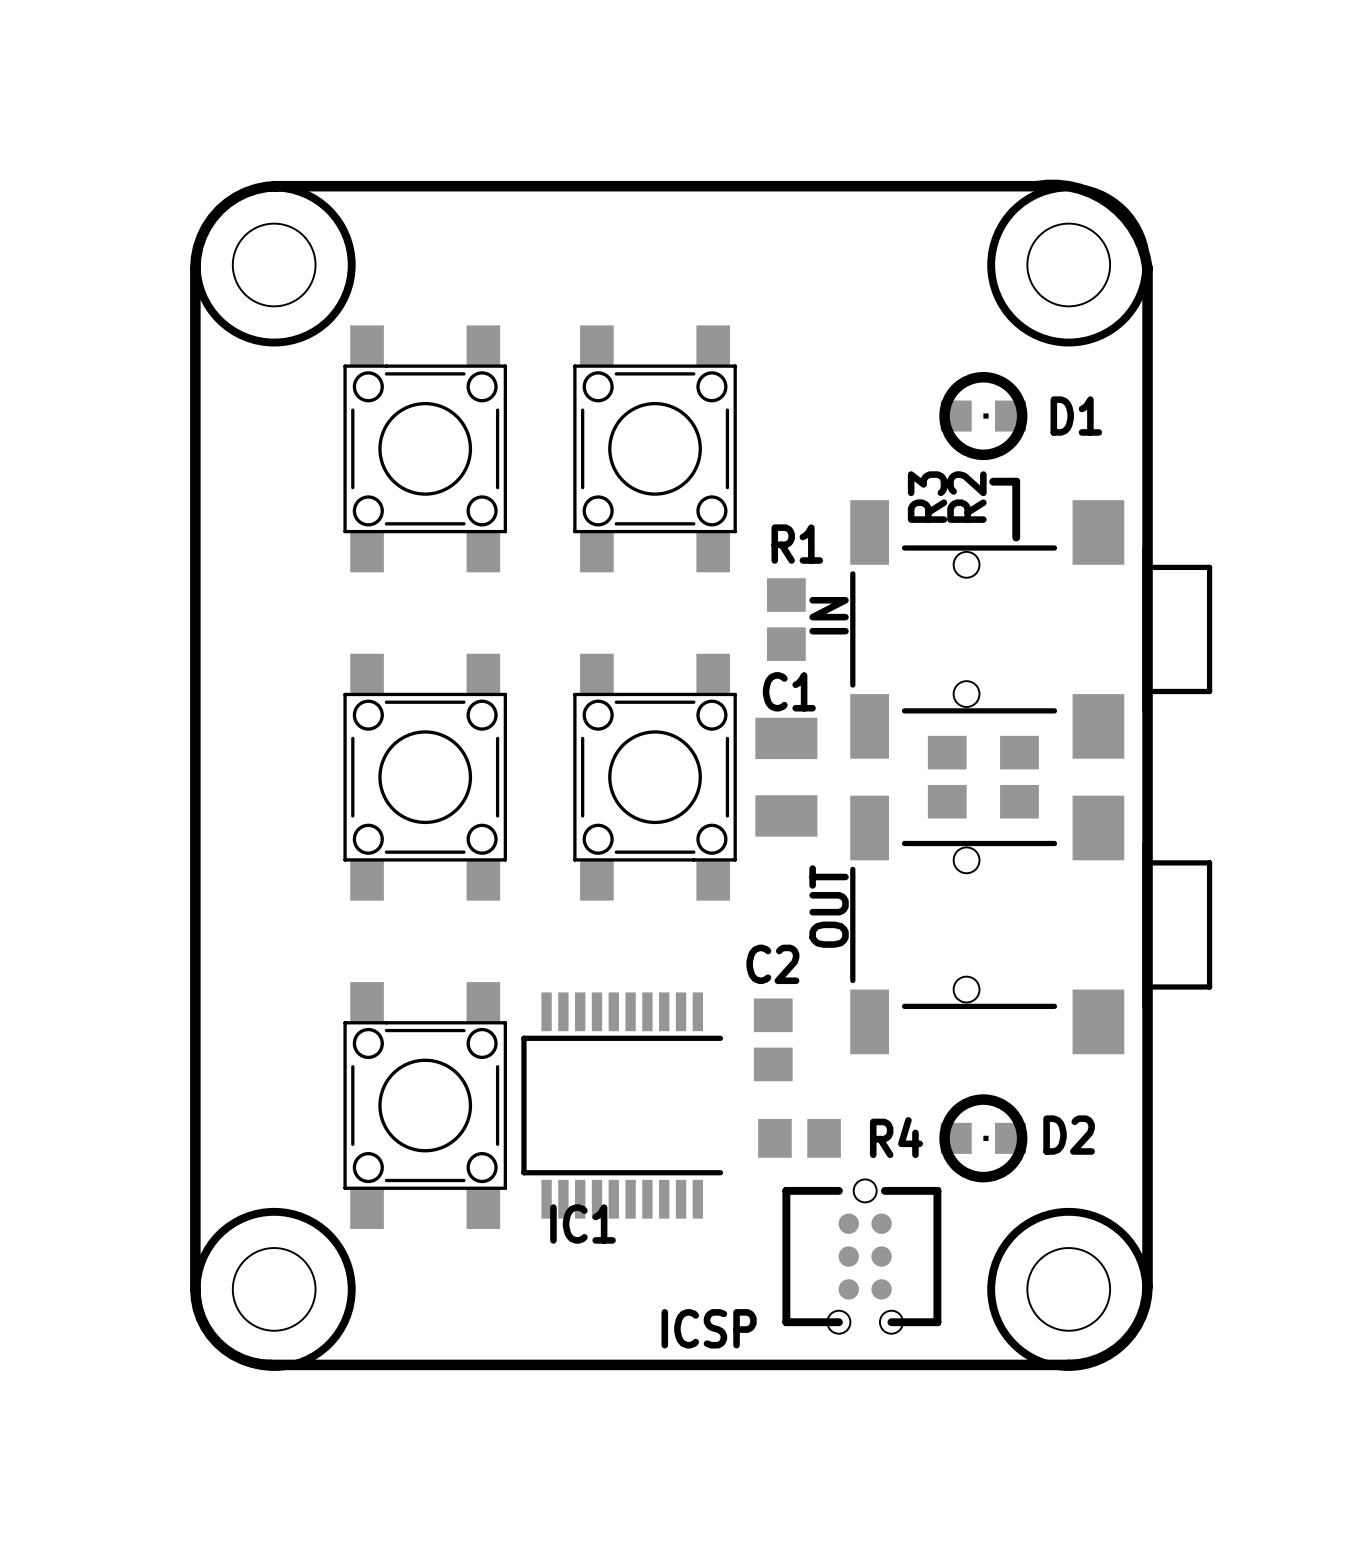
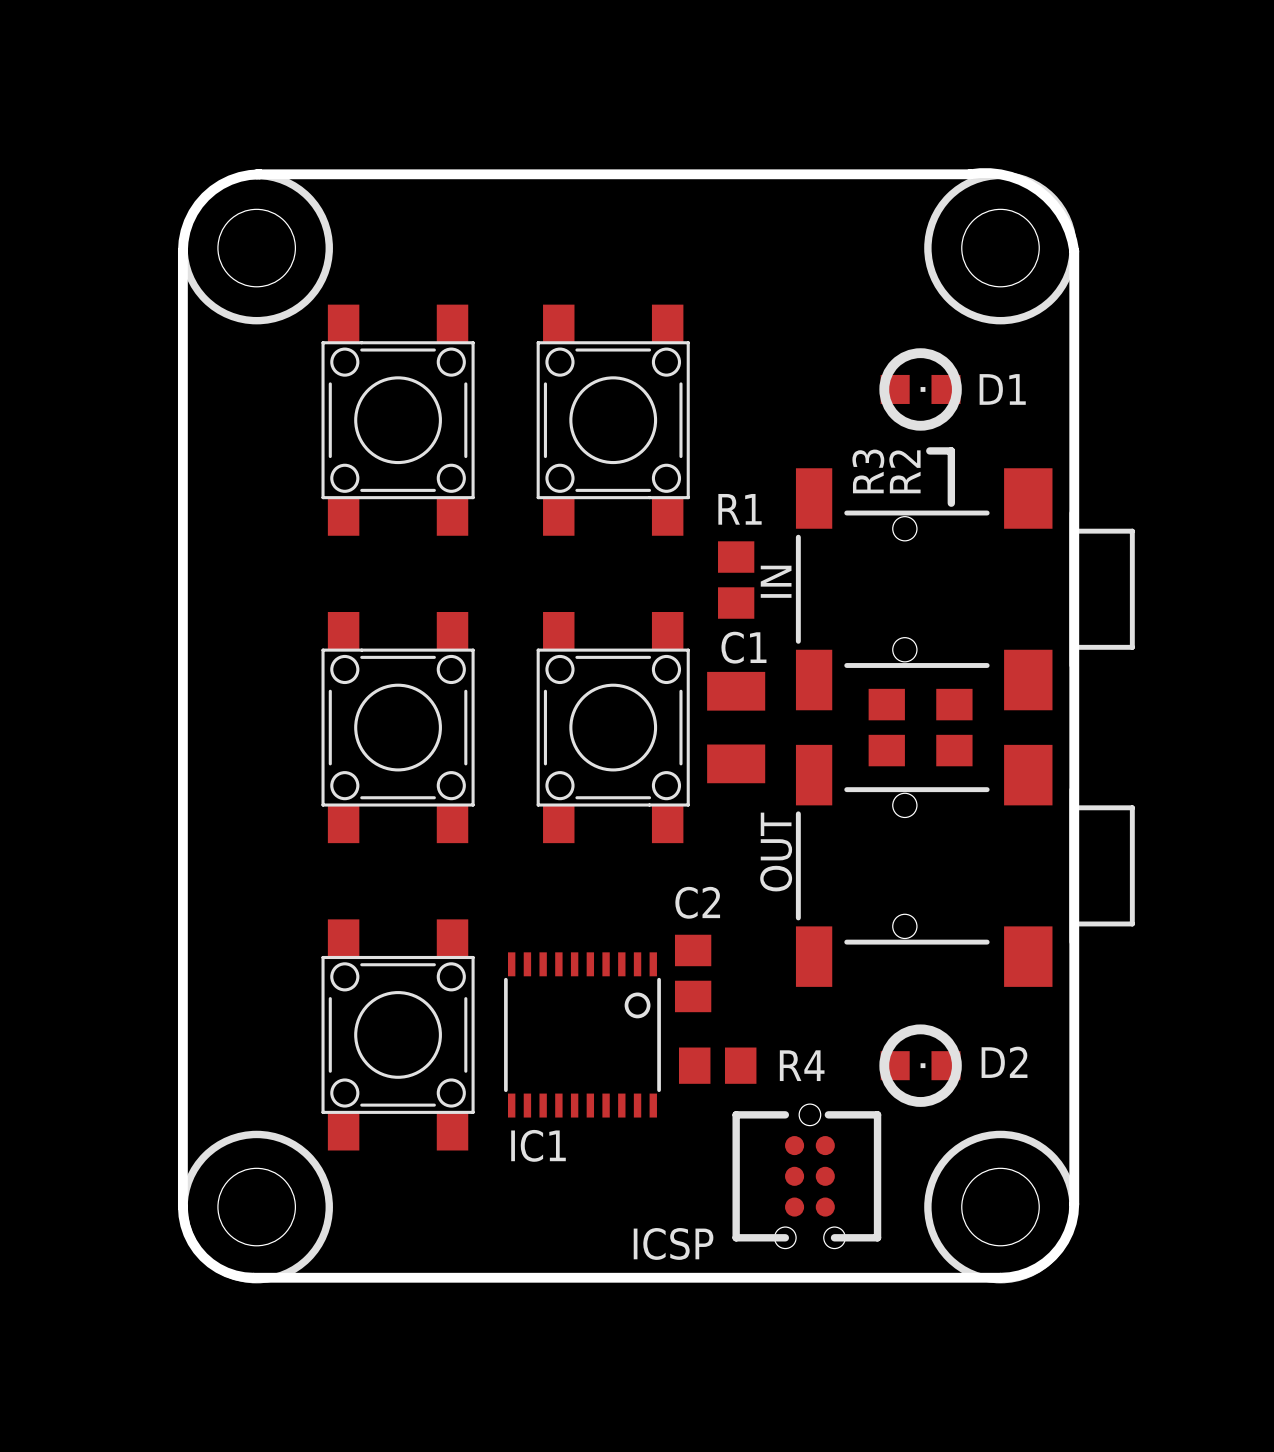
IC1 footprint: [521, 992, 724, 1219] -> [504, 952, 661, 1118]
C2 position: (773, 1039) -> (693, 973)
R4 position: (799, 1138) -> (717, 1065)

